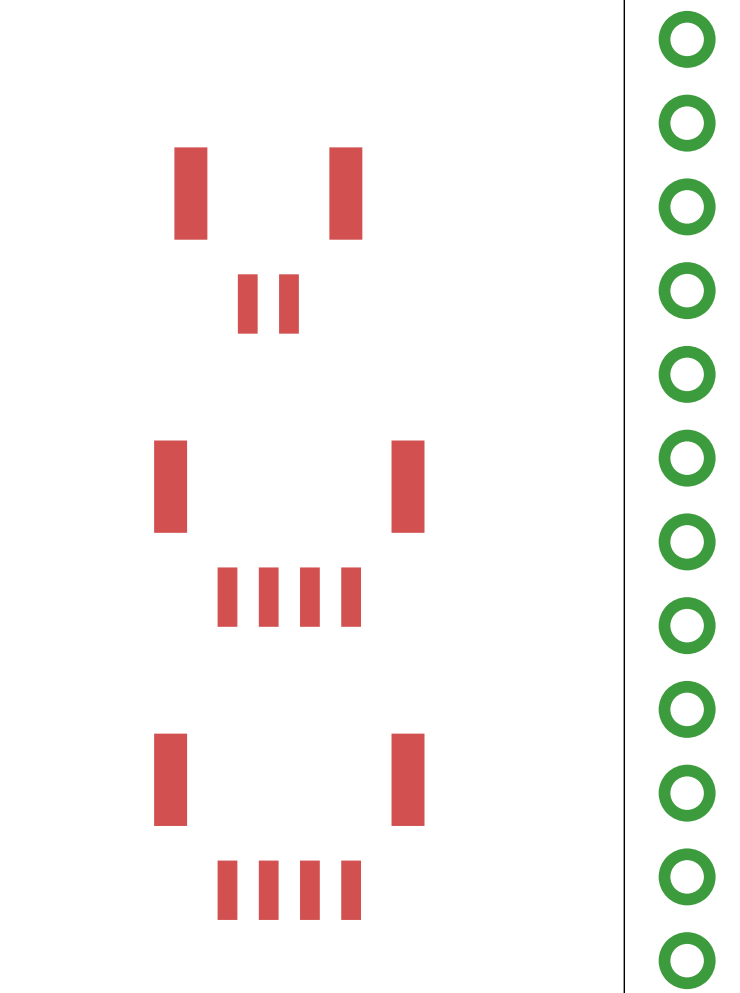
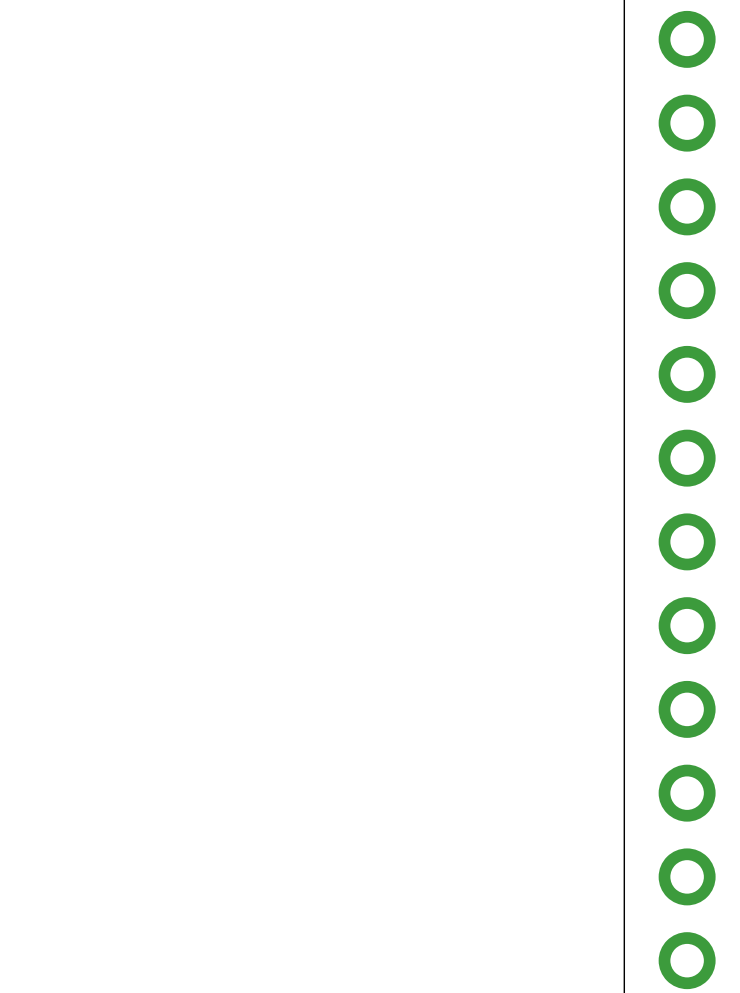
part: (268, 240) -> none
part: (289, 533) -> none
part: (289, 826) -> none

